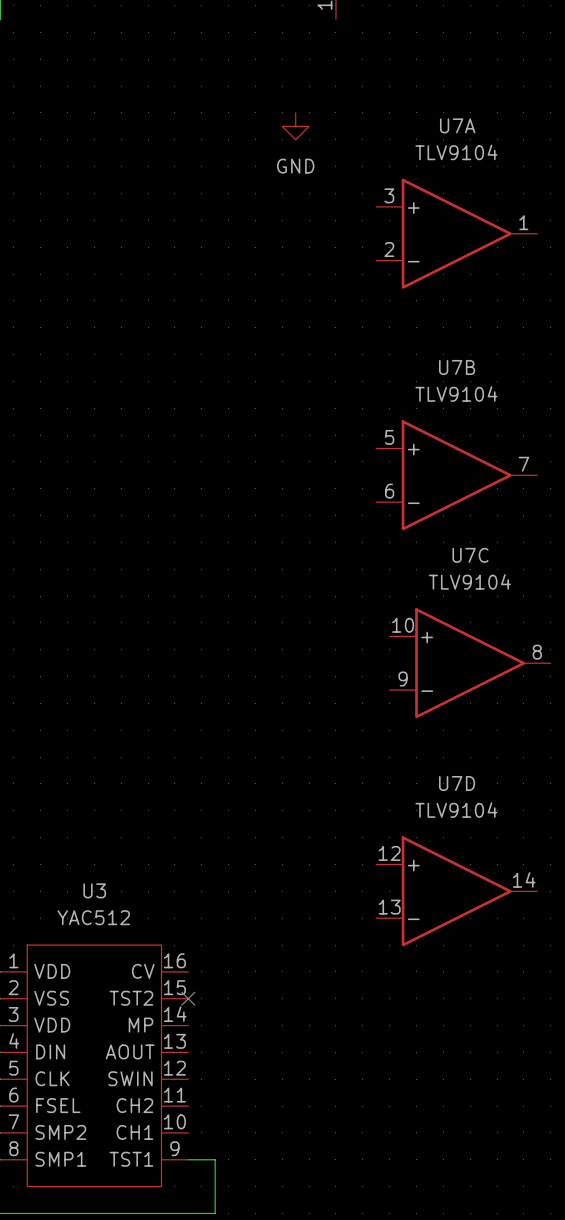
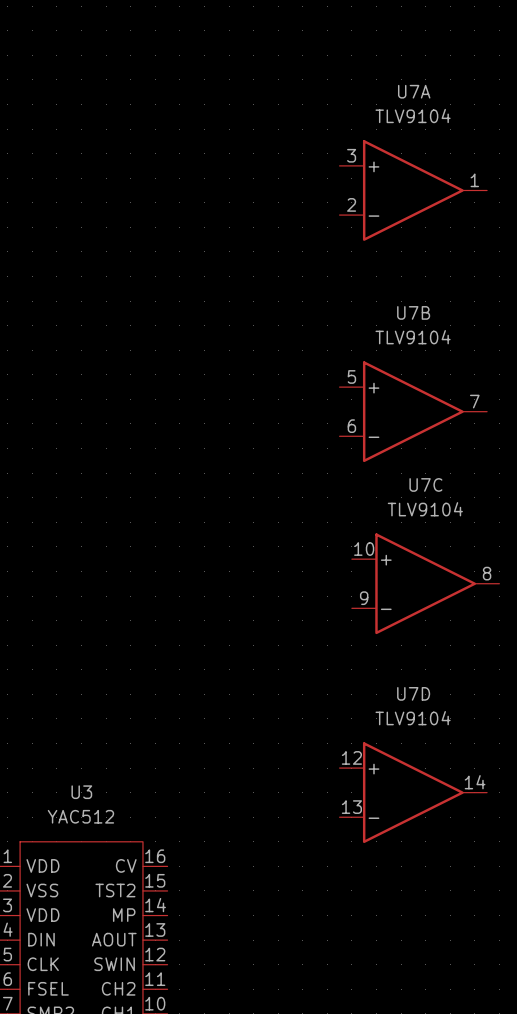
power symbol: GND (295, 126) -> none
no-connect mark: (188, 998) -> none

